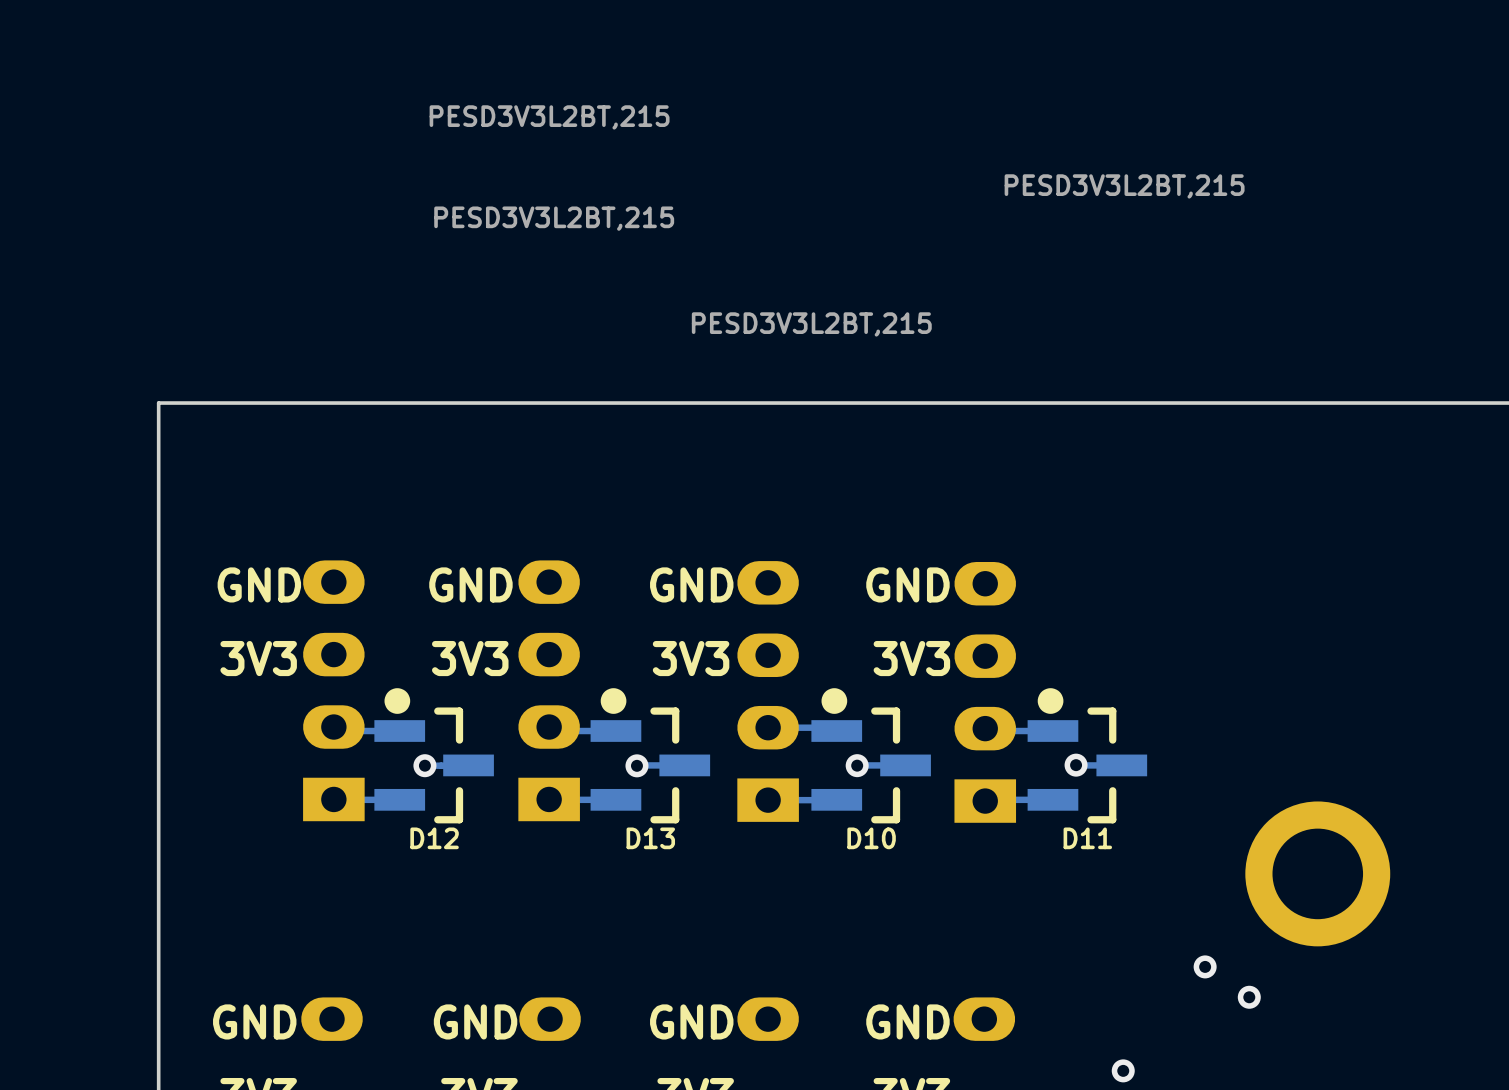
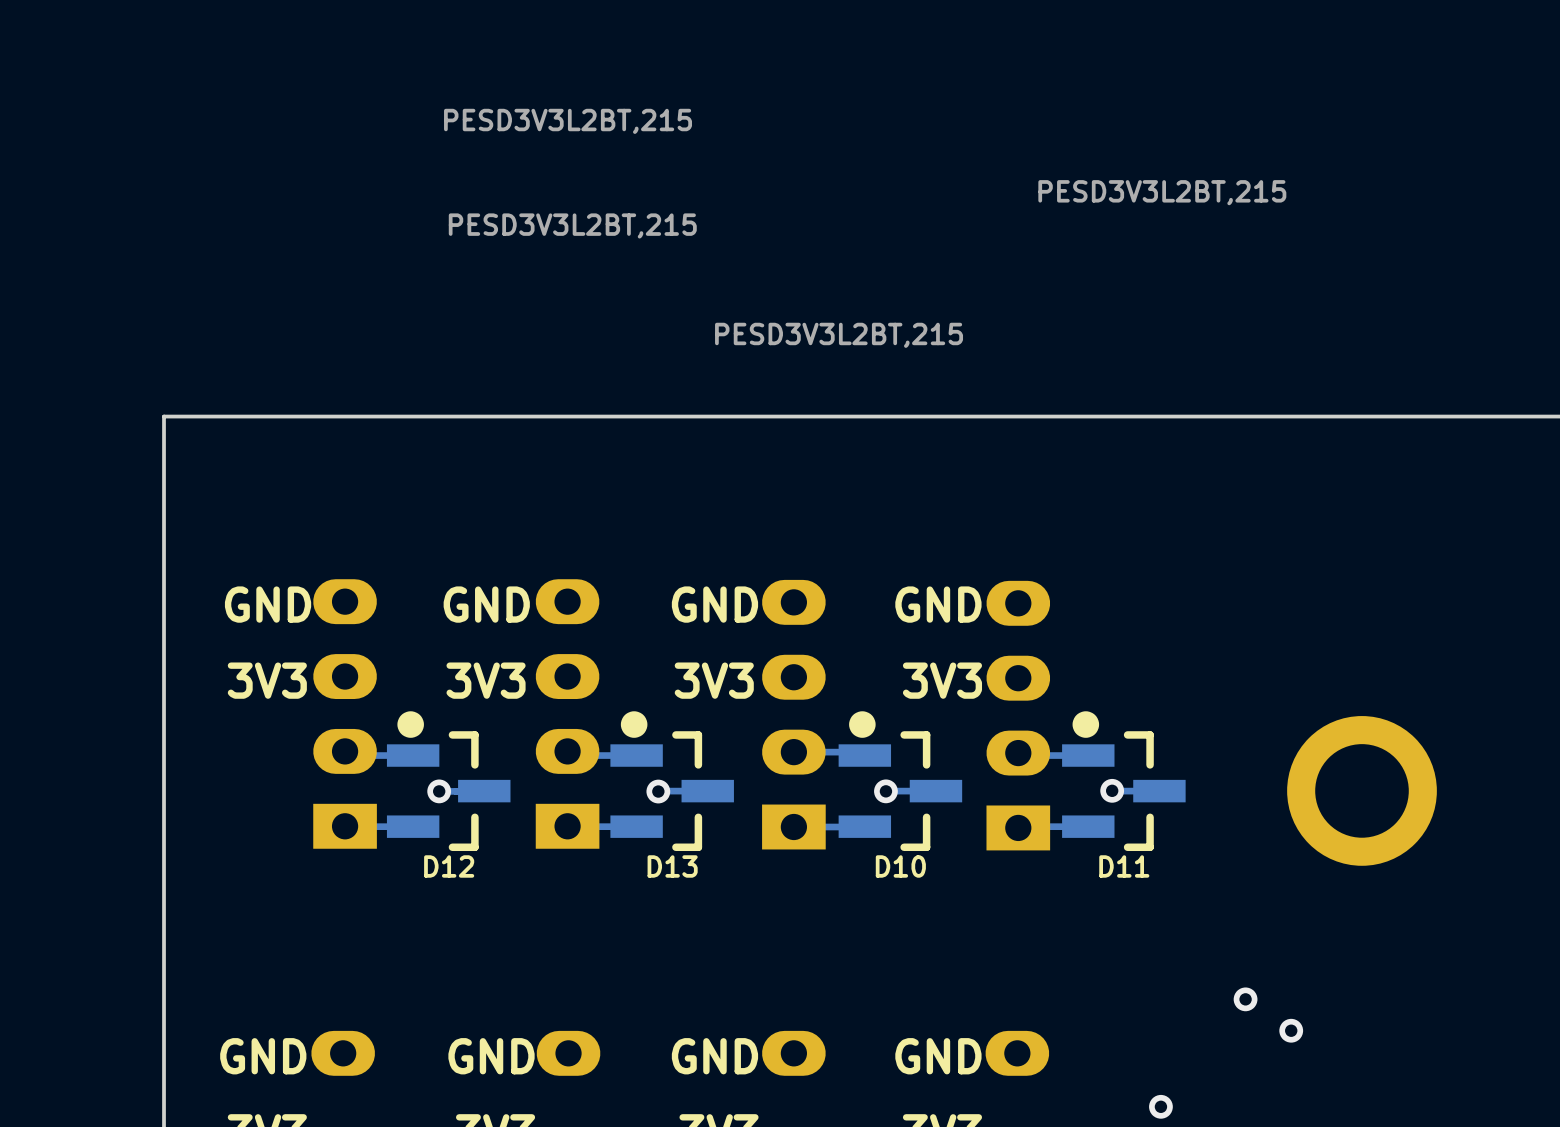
part position: (1317, 873) -> (1361, 790)

